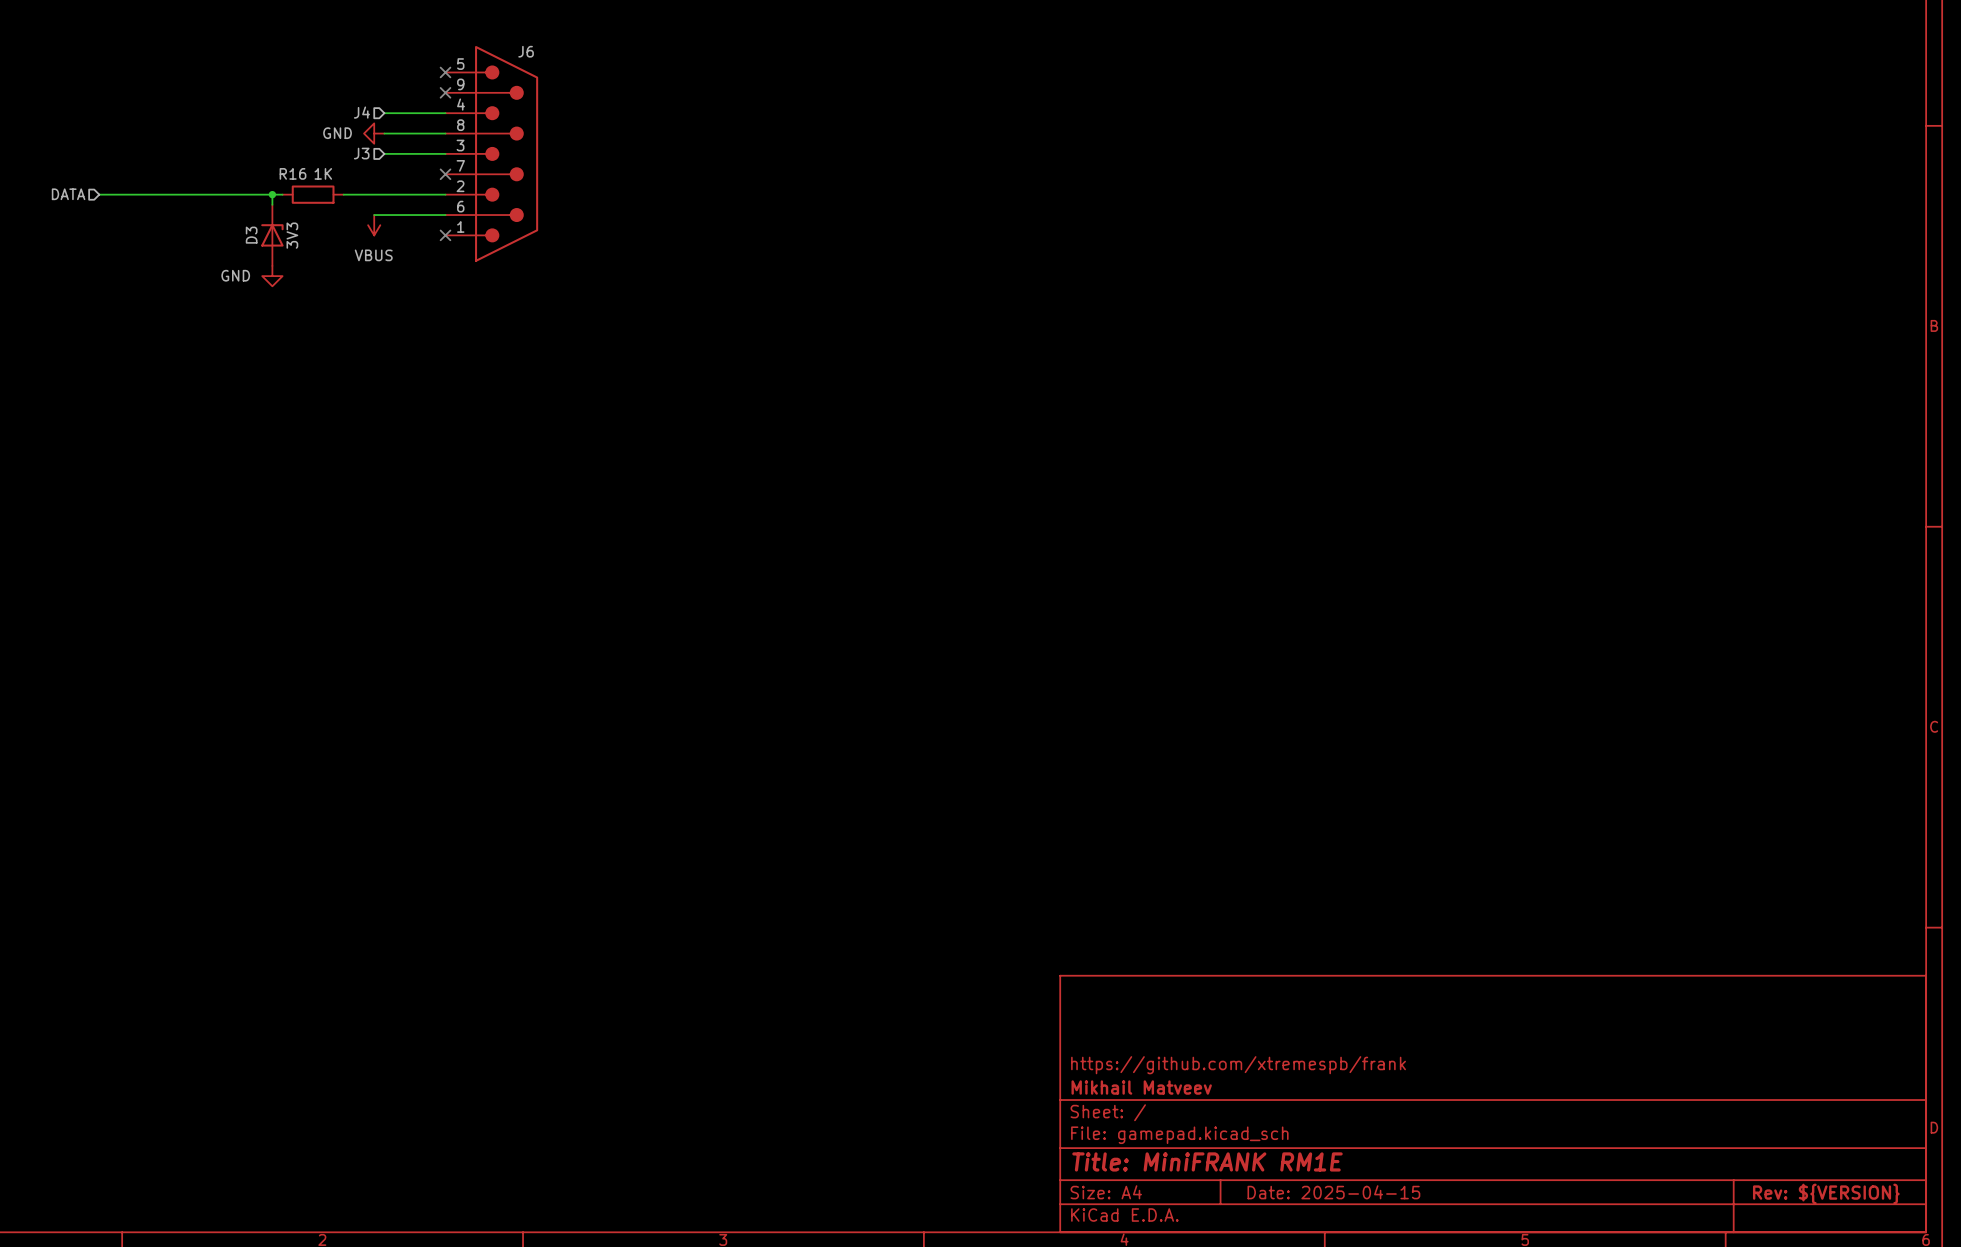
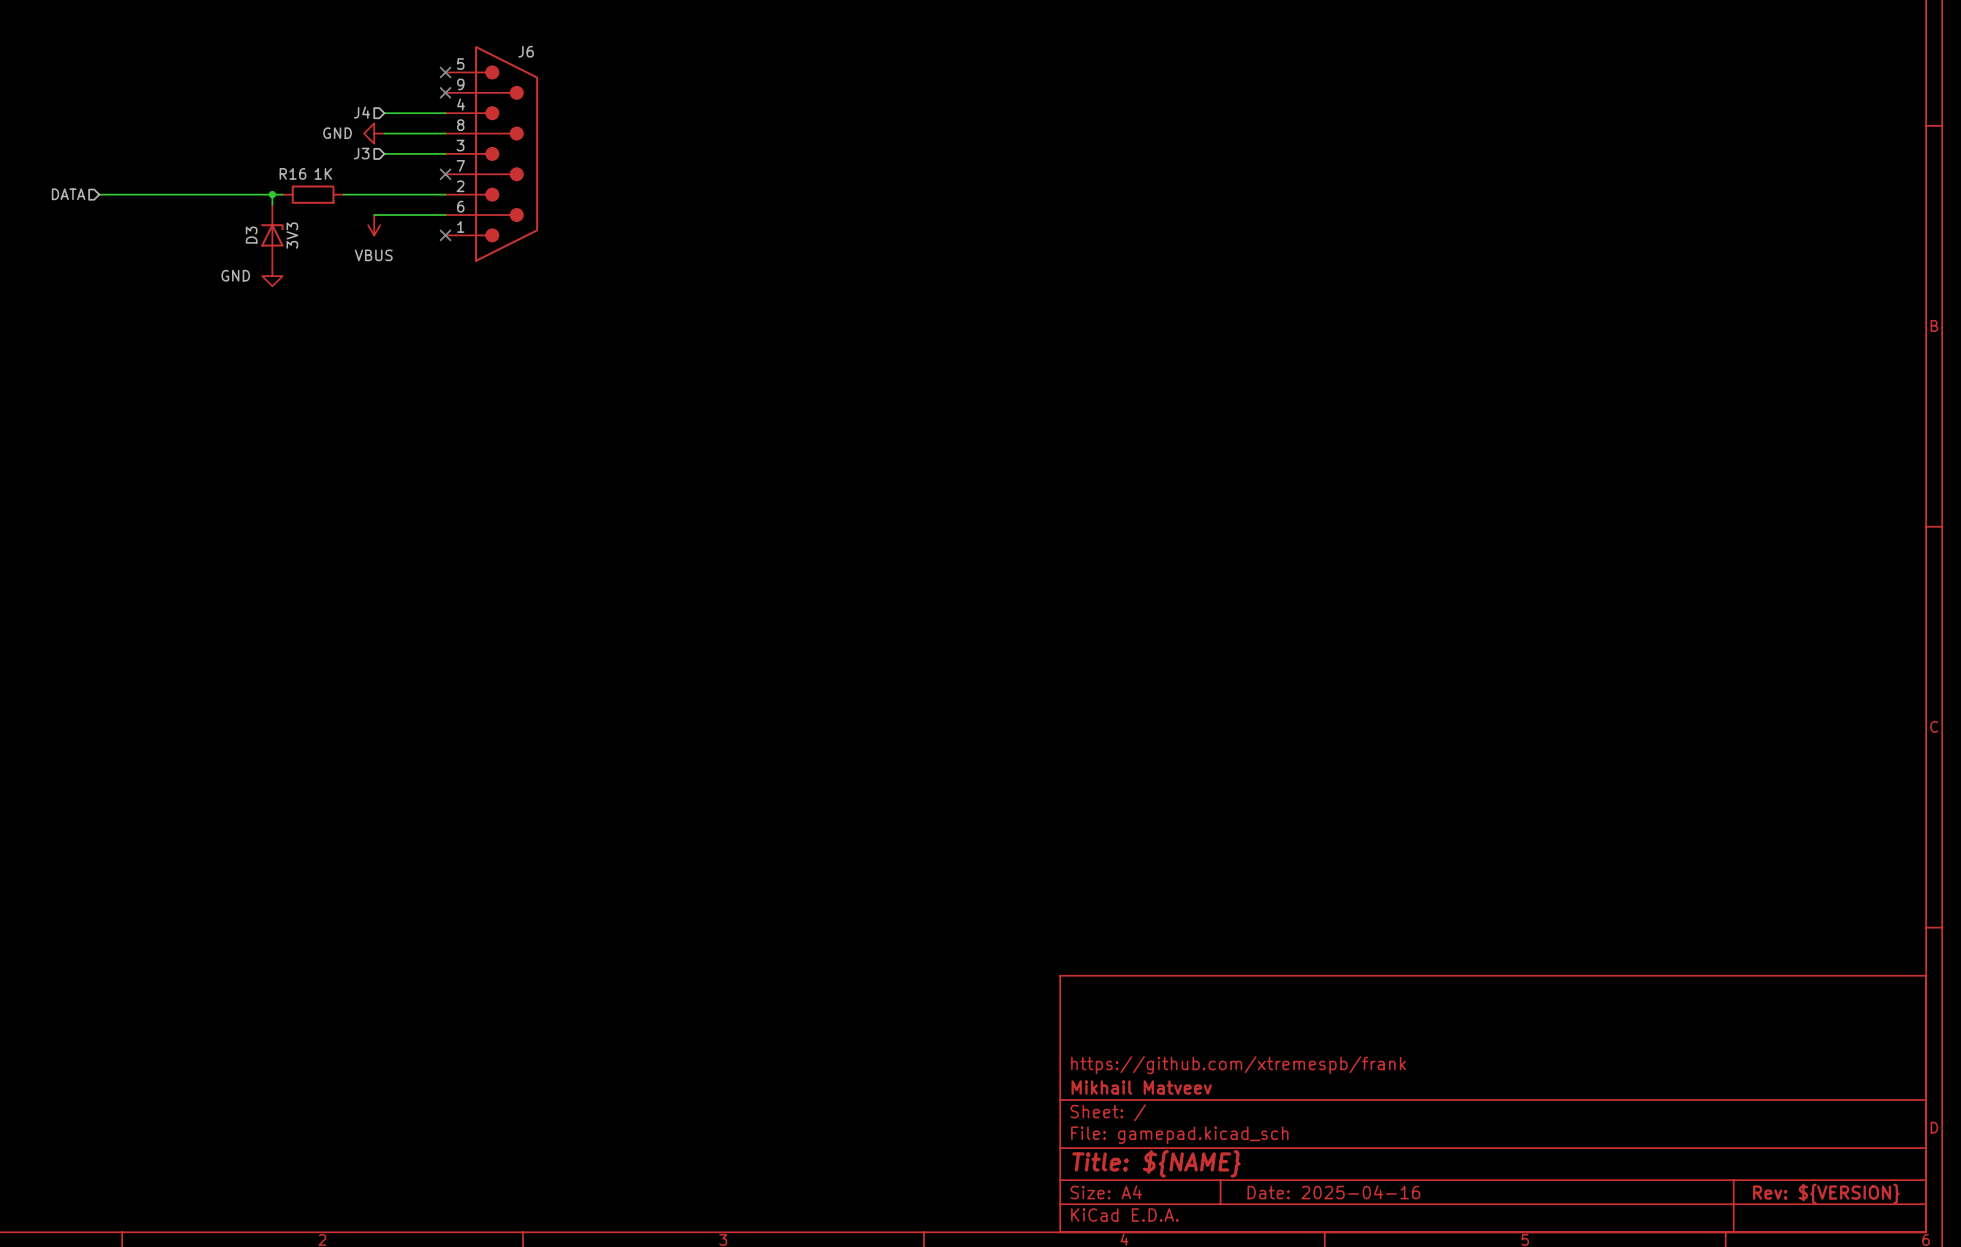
title block: Title: MiniFRANK RM1E (1207, 1161) -> Title: ${NAME} (1156, 1163)
title block: Date: 2025-04-15 (1333, 1192) -> Date: 2025-04-16 (1333, 1192)

